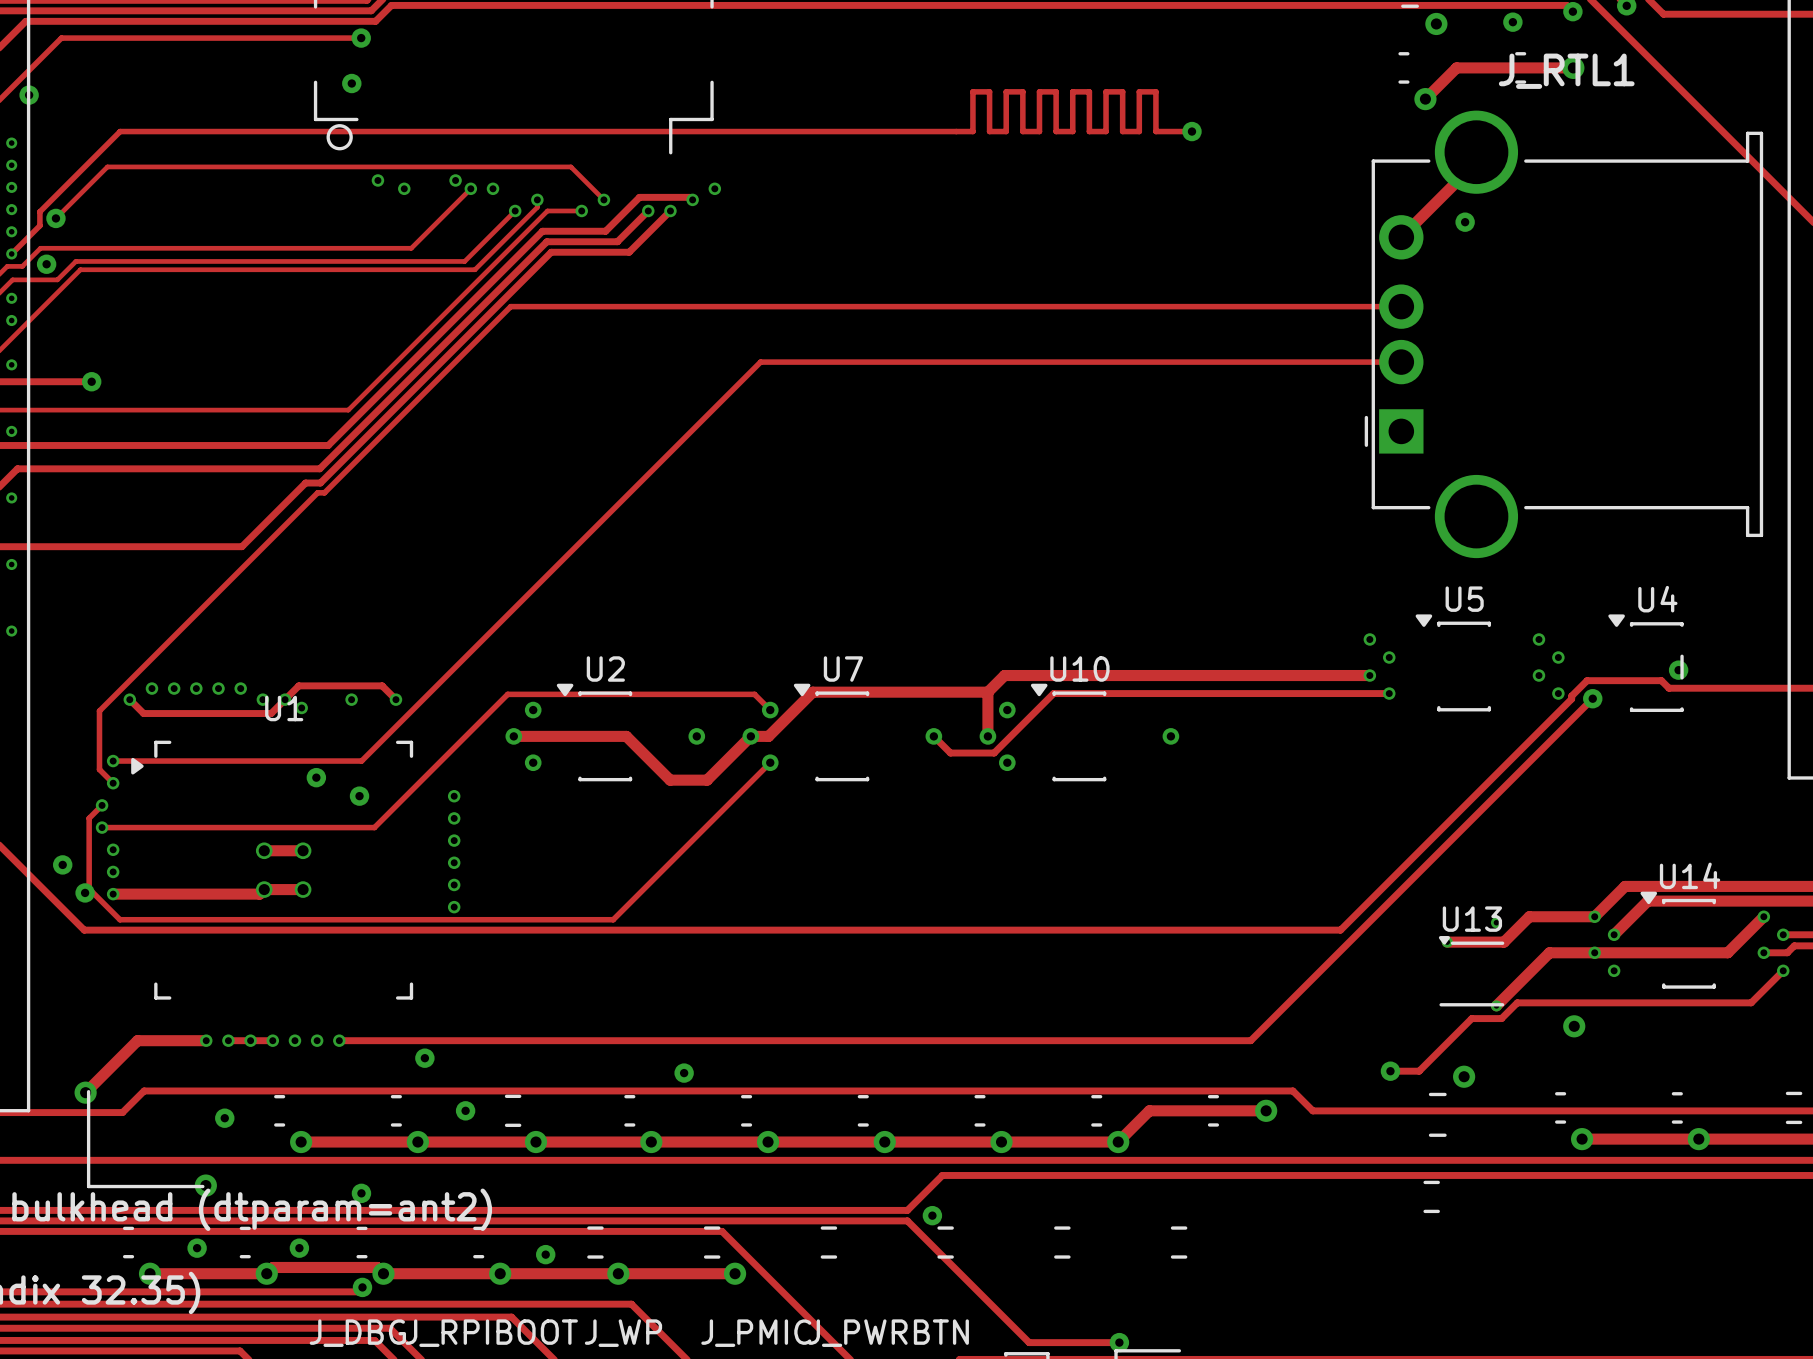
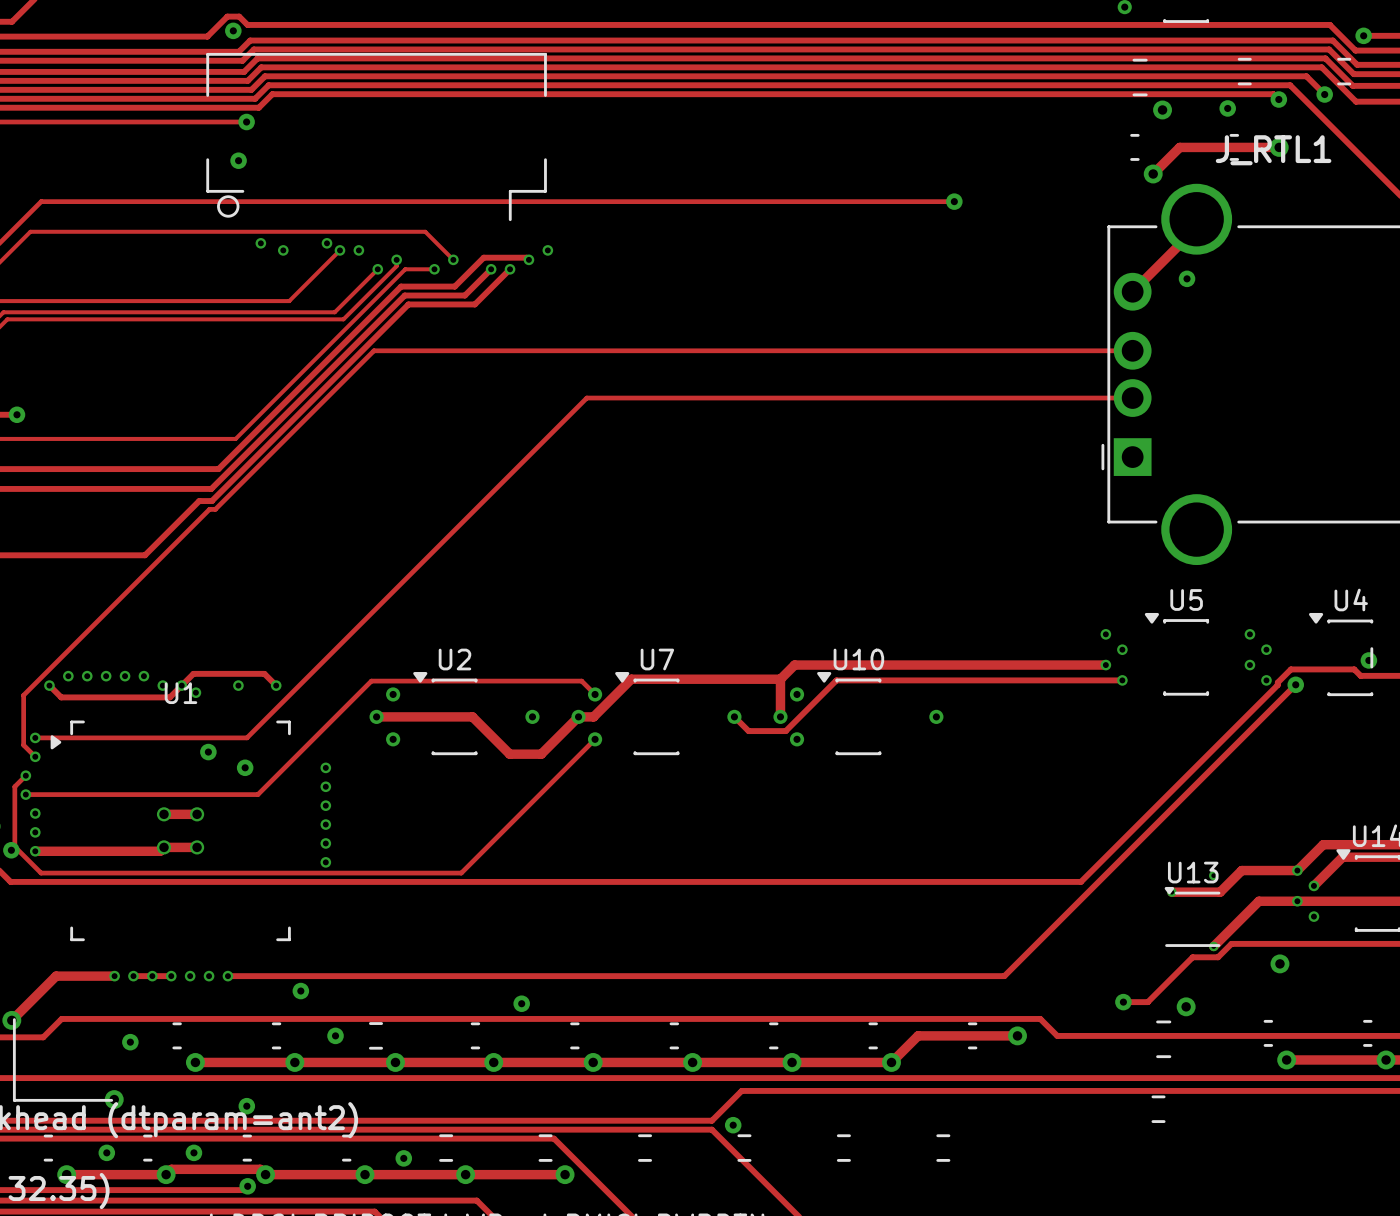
track: (972, 131) (972, 91) (989, 91) (989, 131) -> (767, 201) (781, 201)
track: (1006, 131) (1006, 91) (1022, 91) (1022, 131) -> (796, 201) (810, 201)
track: (1039, 131) (1039, 91) (1056, 91) (1056, 131) -> (824, 201) (838, 201)
track: (1072, 131) (1072, 91) (1089, 91) (1089, 131) -> (852, 201) (866, 201)
track: (1106, 131) (1106, 91) (1122, 91) (1122, 131) -> (881, 201) (895, 201)
track: (1139, 131) (1139, 91) (1155, 91) (1155, 131) -> (909, 201) (923, 201)

